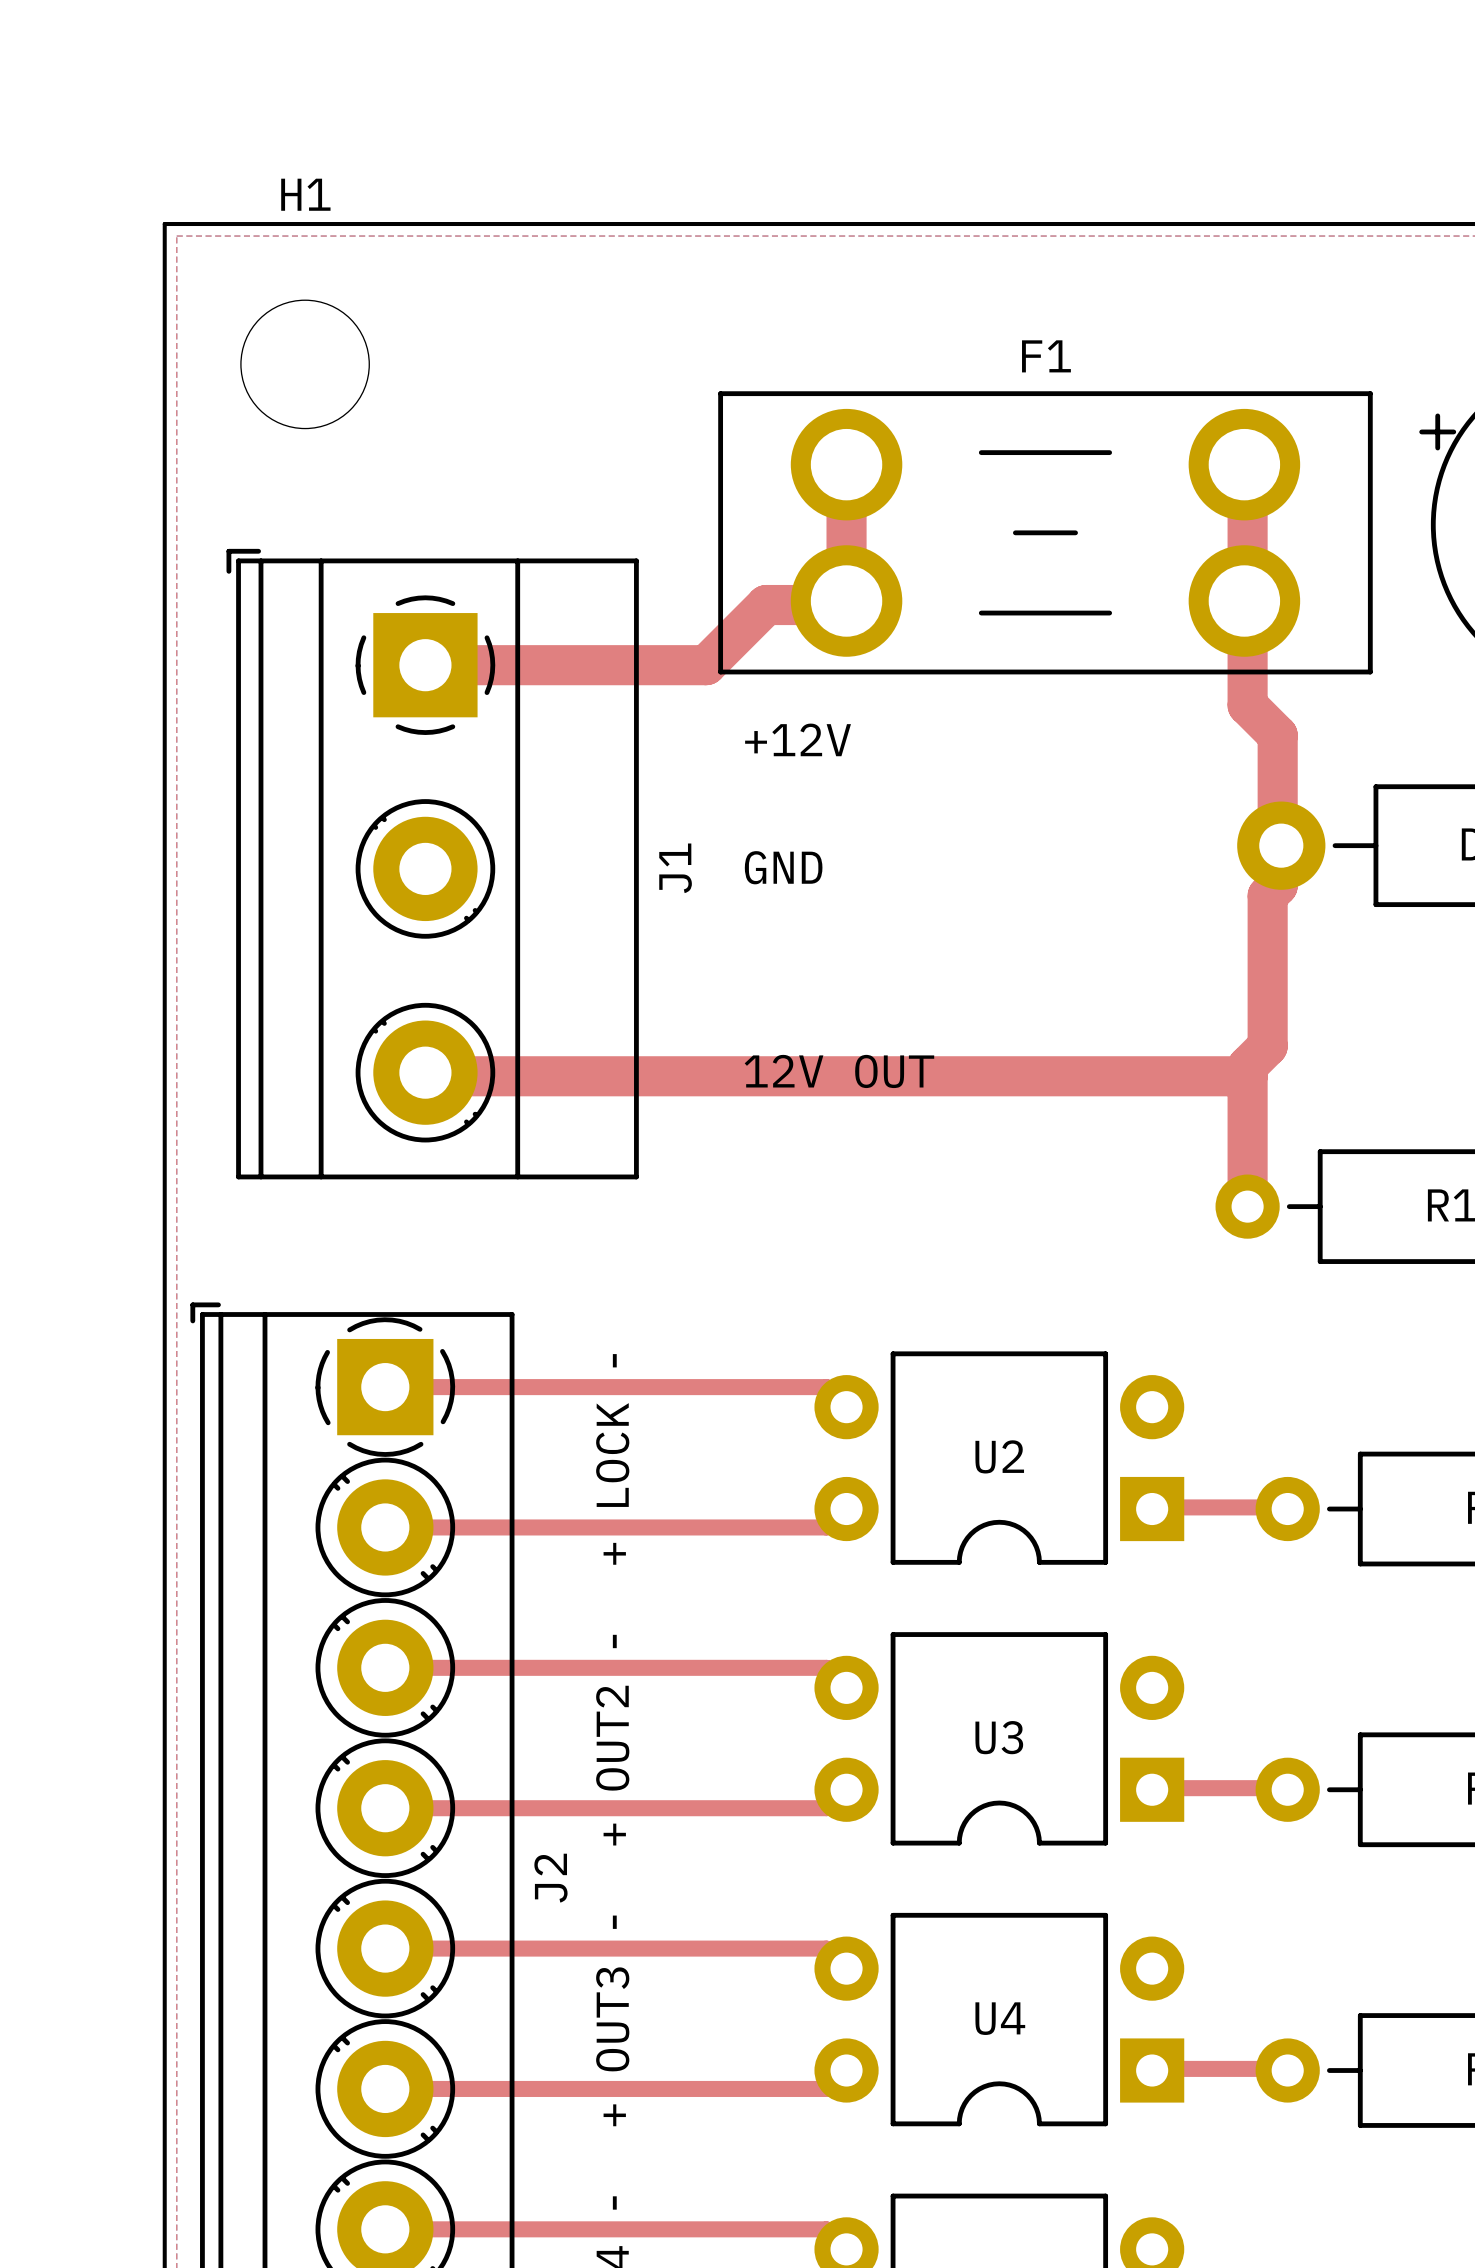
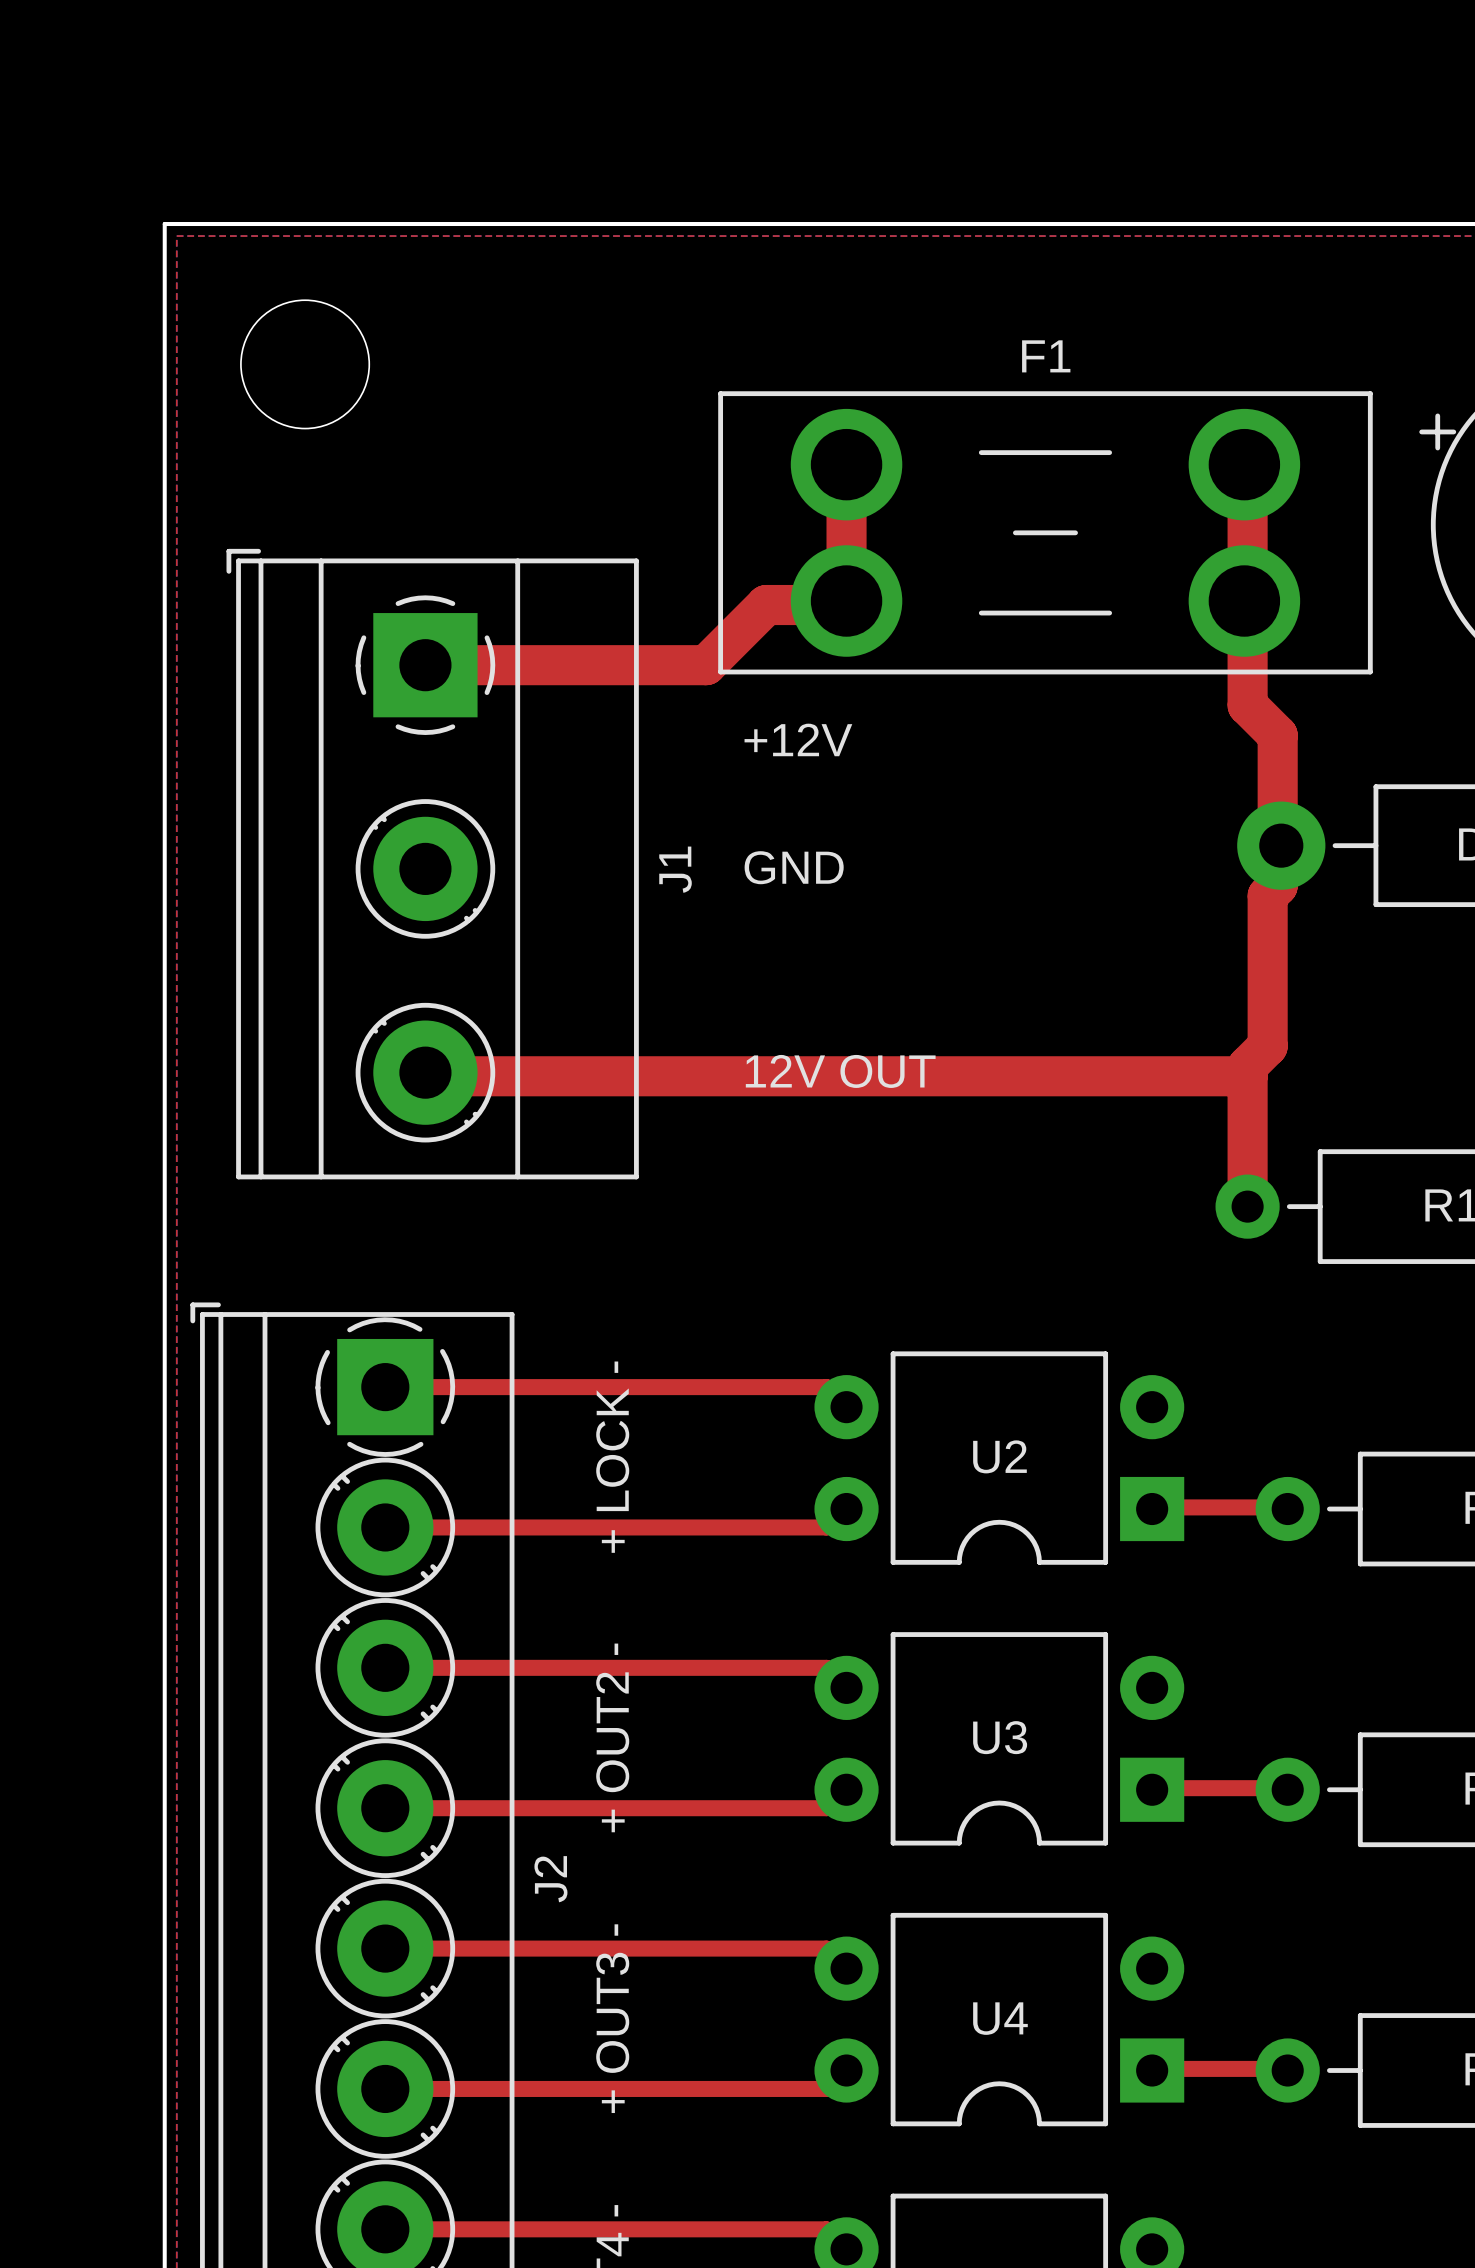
H1 name: H1 (305, 194) -> none

